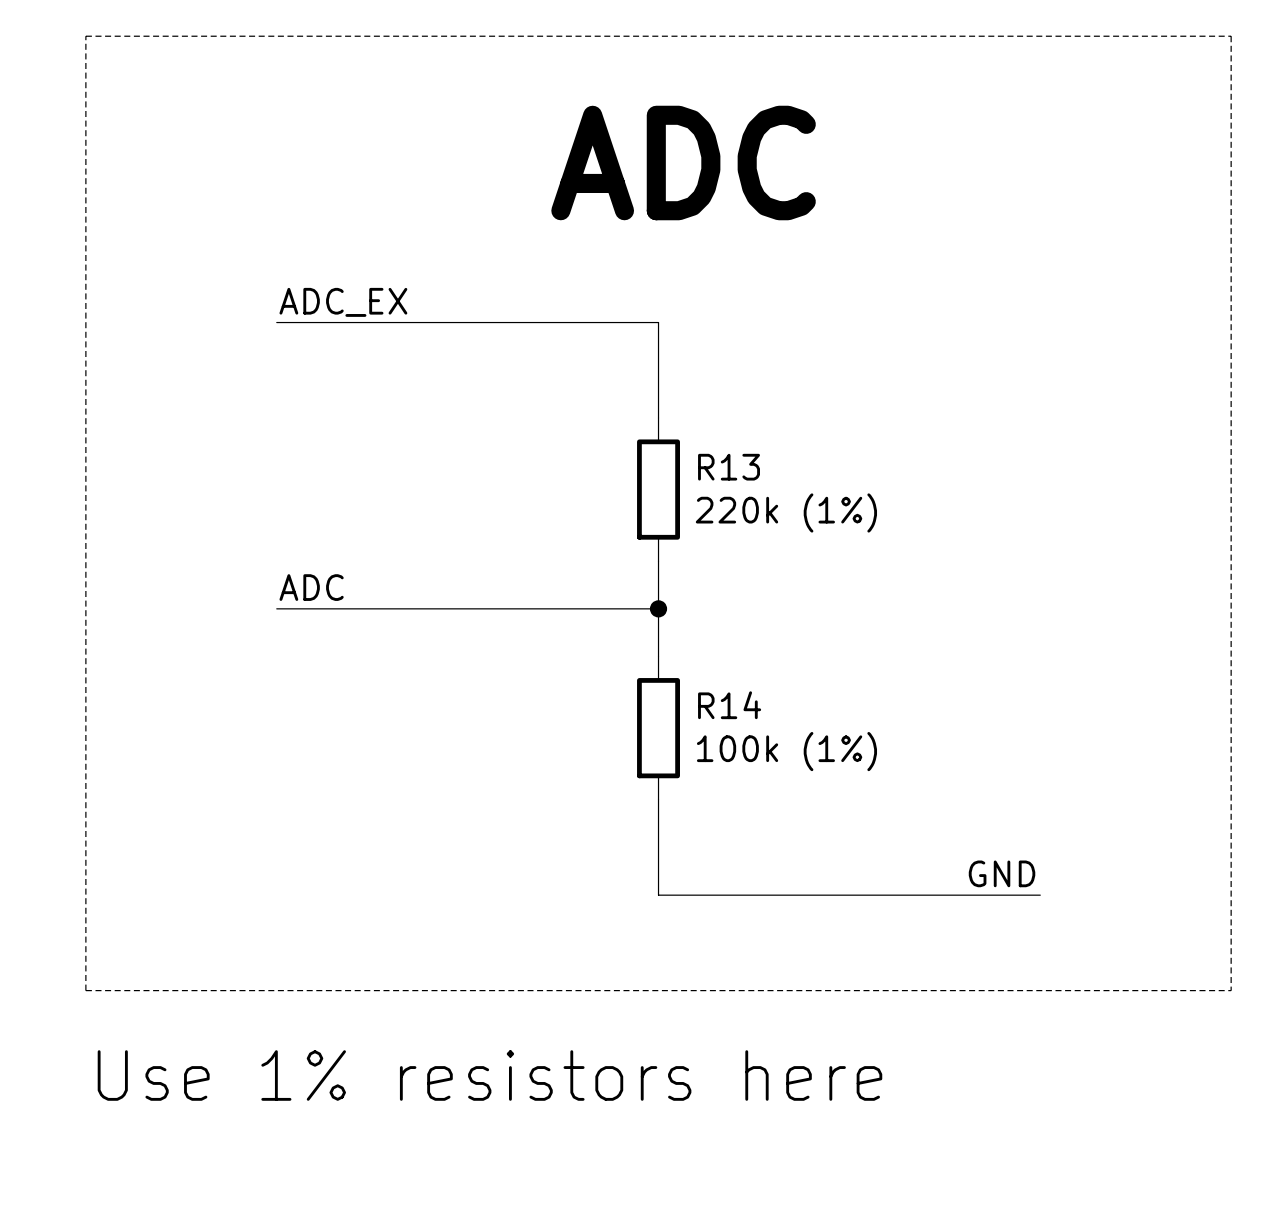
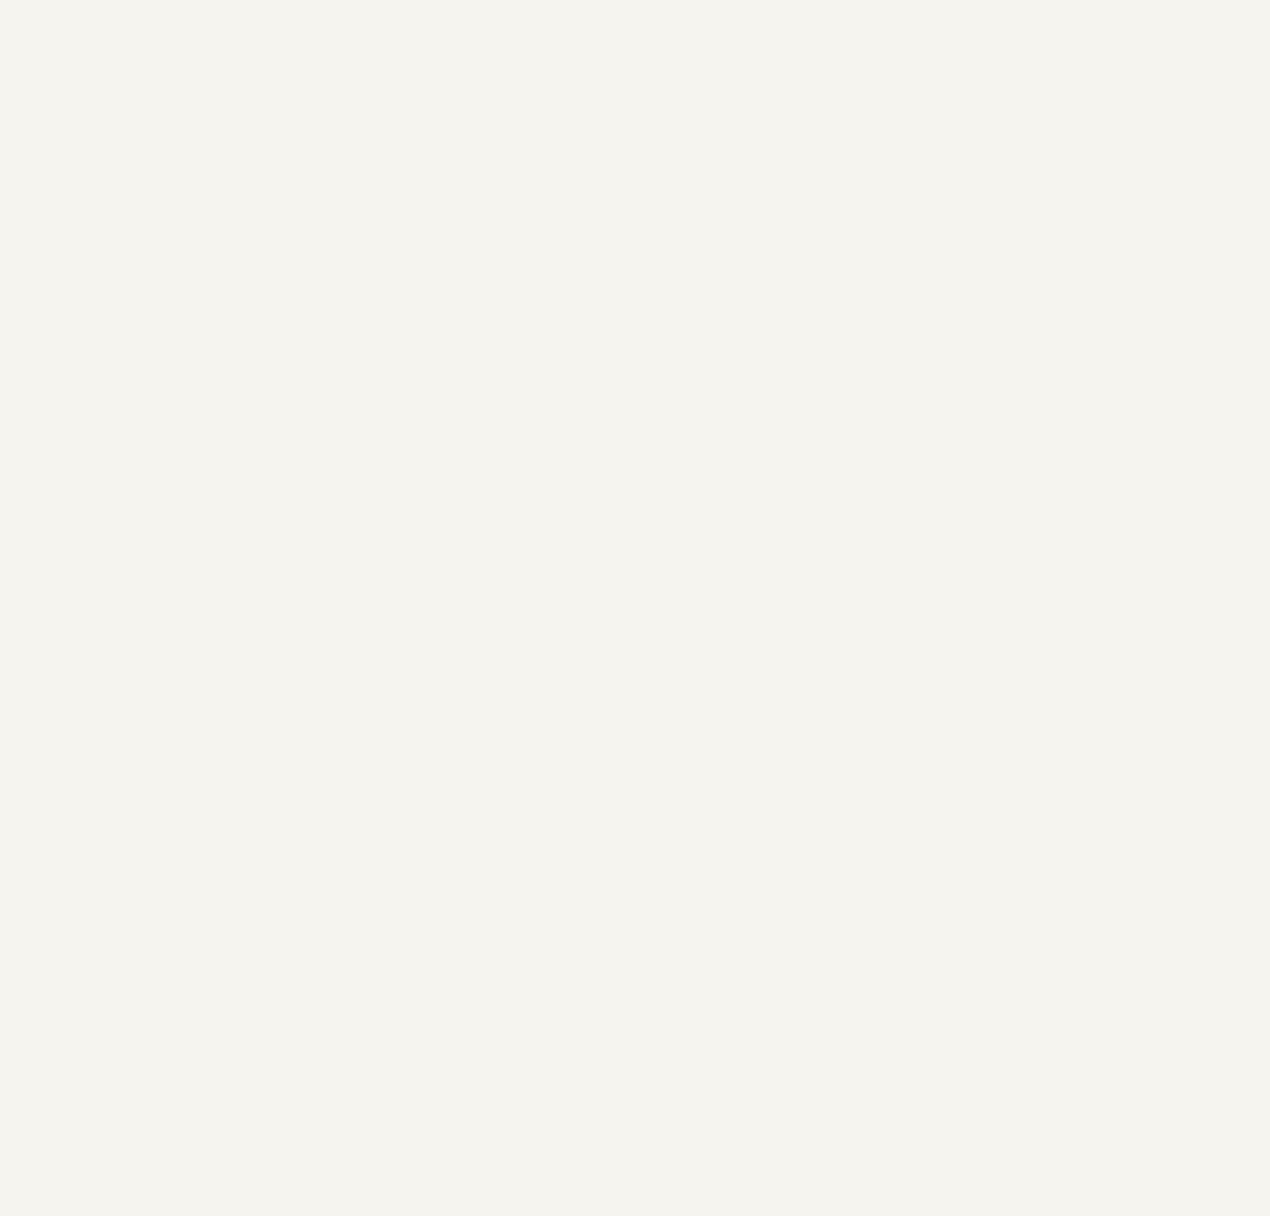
line: (85, 36) (1231, 36) (1231, 990) (85, 990) (85, 36) -> none
text: ADC (683, 163) -> none
label: ADC_EX (343, 302) -> none
wire: (276, 322) (658, 322) (658, 417) -> none
R13: 220k (1%) (658, 489) -> none
wire: (658, 561) (658, 656) -> none
label: ADC (311, 587) -> none
wire: (276, 608) (658, 608) -> none
junction: (658, 608) -> none
R14: 100k (1%) (658, 728) -> none
wire: (658, 799) (658, 895) (1040, 895) -> none
label: GND (1002, 873) -> none
text: Use 1% resistors here (489, 1075) -> none

